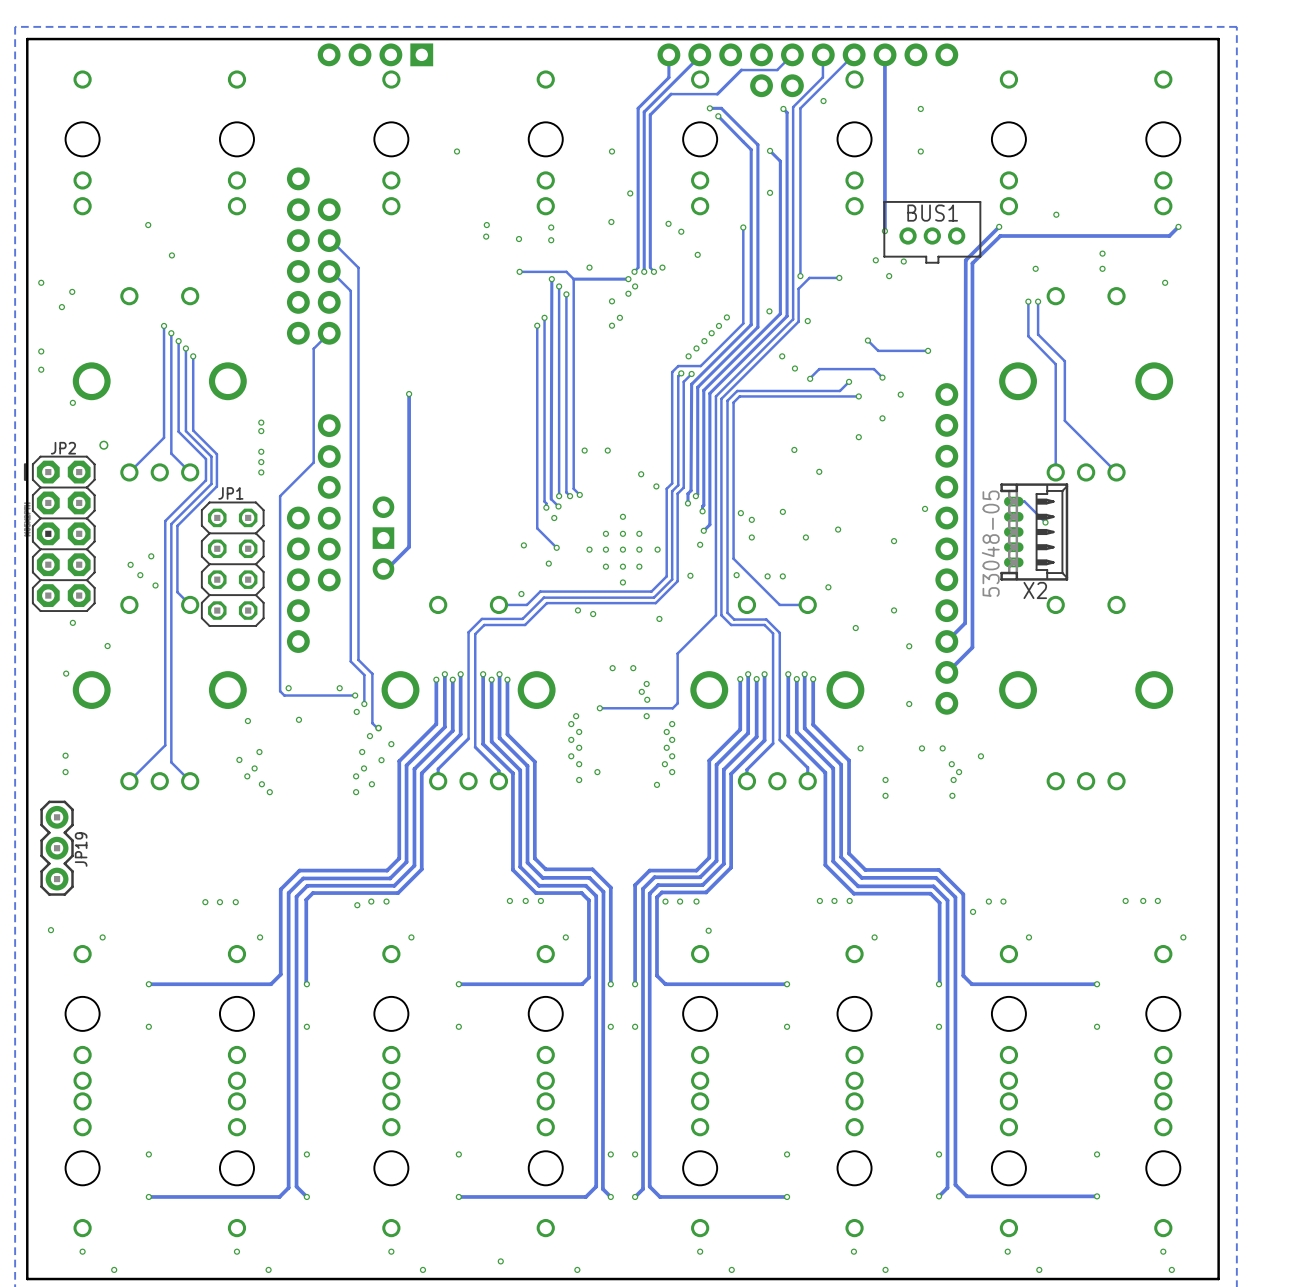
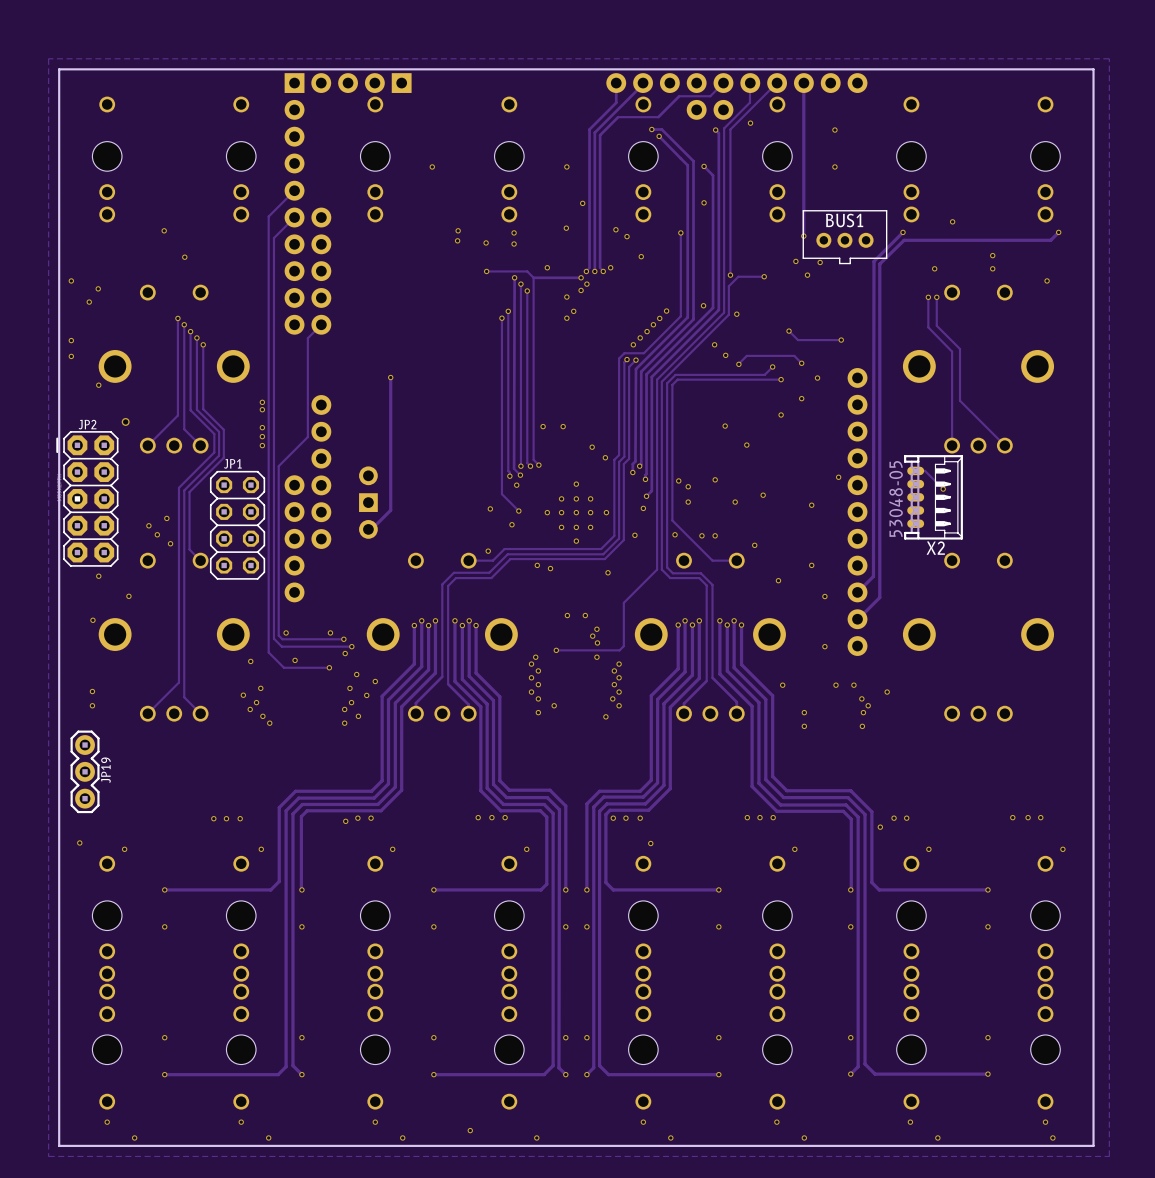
part: none -> (294, 123)
track: none -> (294, 190) (268, 216) (268, 652) (283, 667) (329, 667)
track: none -> (294, 217) (273, 238) (273, 638) (281, 646) (350, 646)
track: (329, 240) (358, 267) (358, 659) (372, 673) (372, 723) (378, 728) -> none
track: (329, 271) (350, 290) (350, 661) (364, 675) (364, 704) -> none
via: none -> (329, 667)
via: (378, 728) -> none

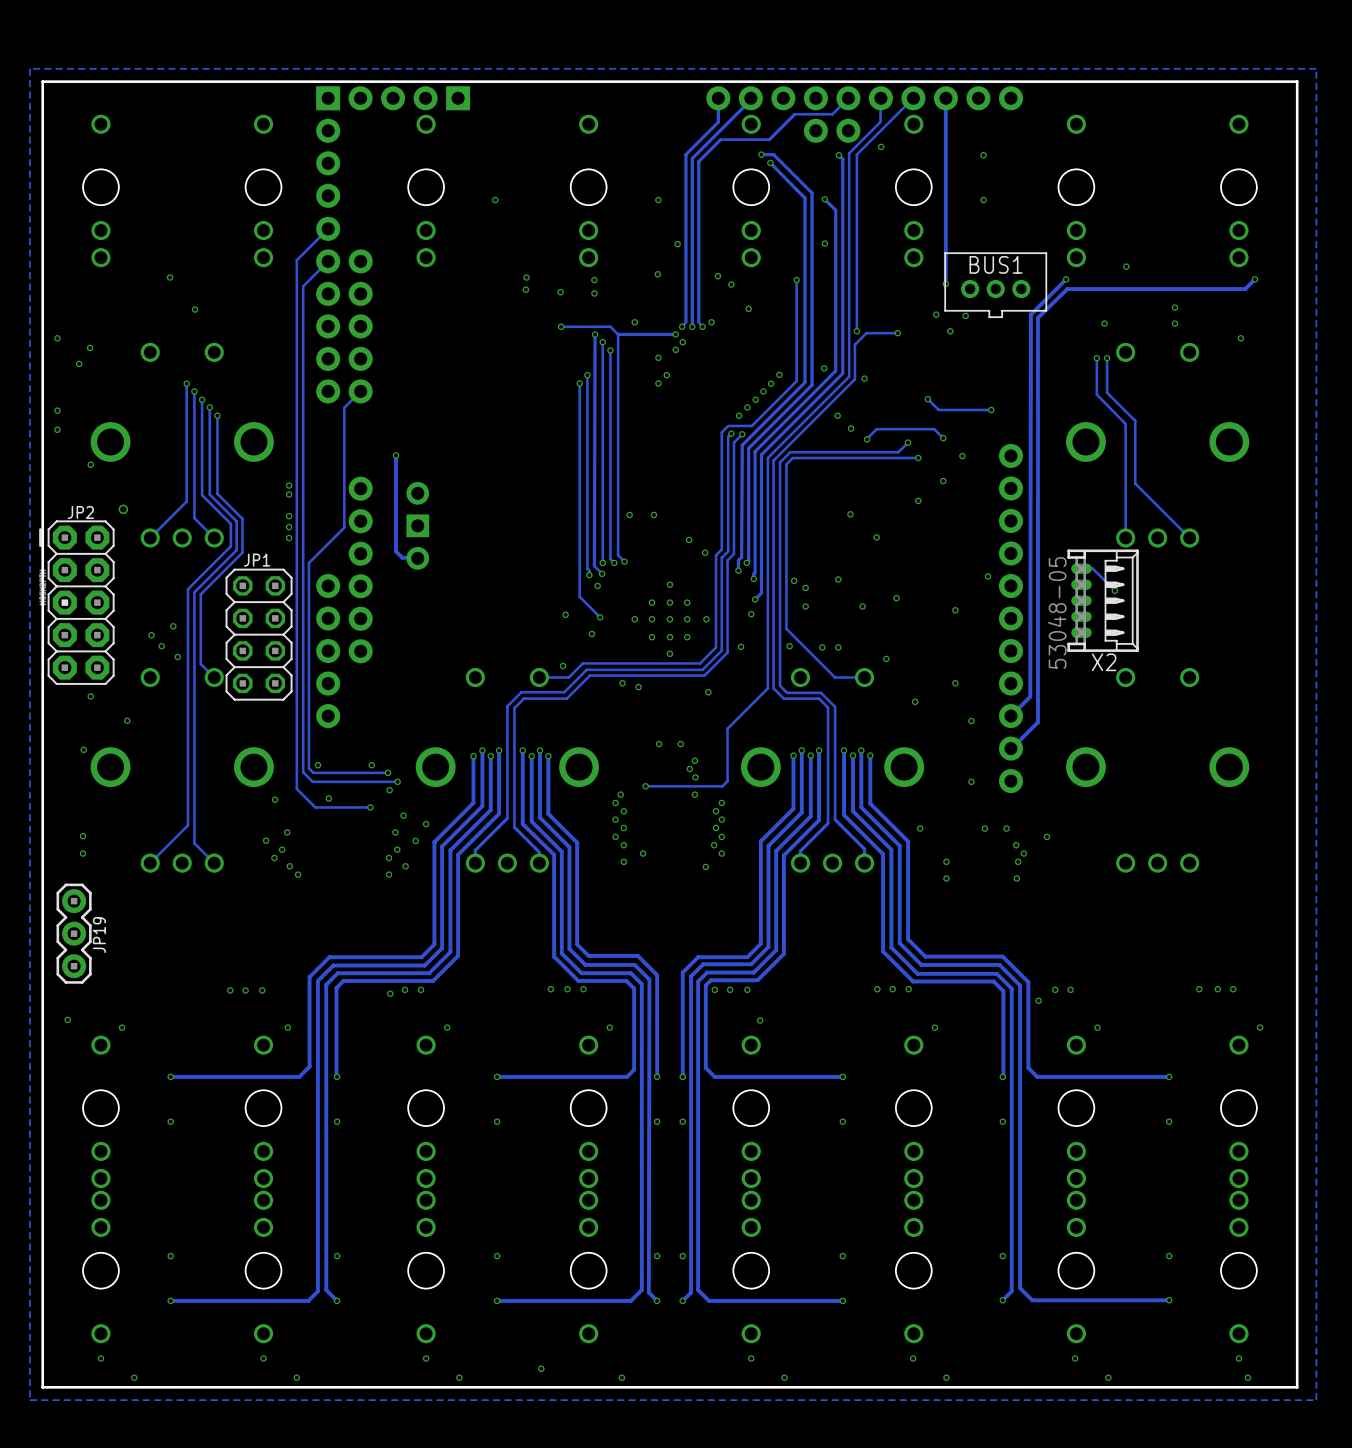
track: none -> (396, 455) (396, 551) (402, 557) (417, 558)
track: (390, 377) (390, 510) (371, 529) (368, 529) -> none
via position: (390, 377) -> (396, 455)
part position: (368, 502) -> (417, 525)

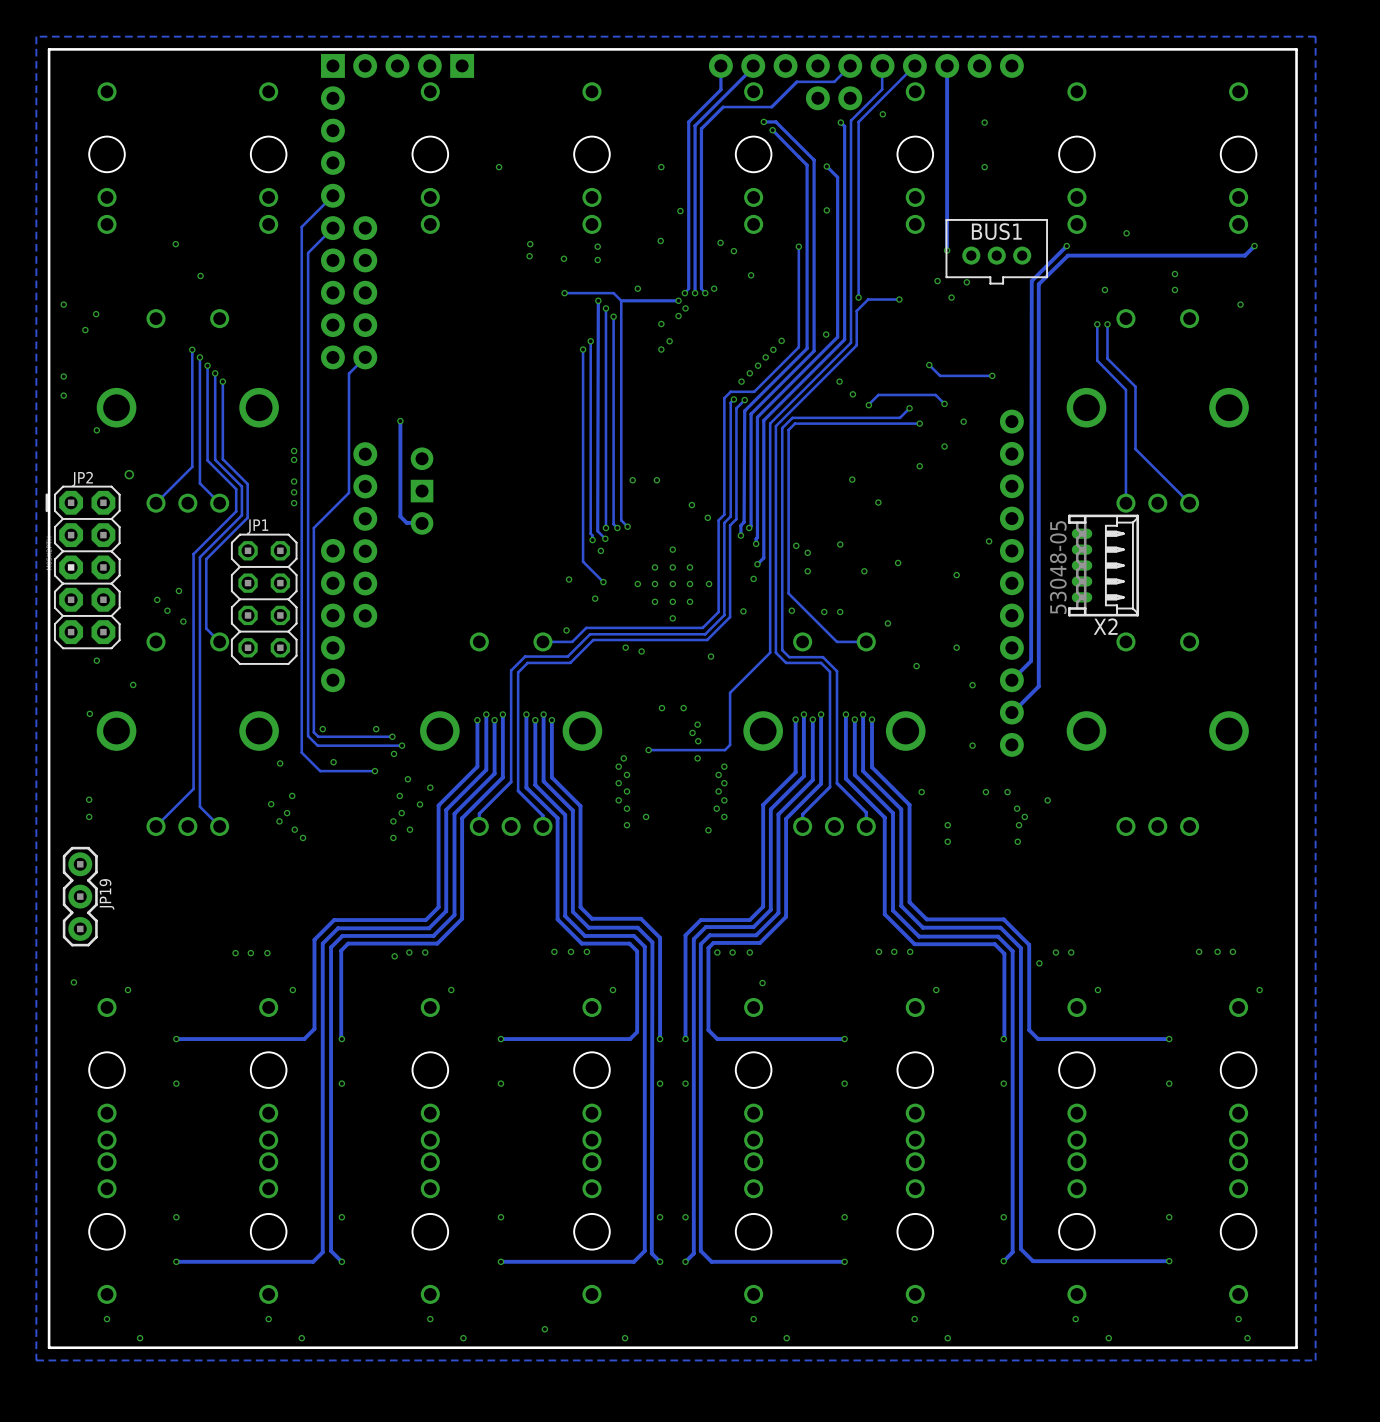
via: (864, 378) -> none
track: (1081, 568) (1092, 568) (1114, 590) -> none
via: (1114, 590) -> none

